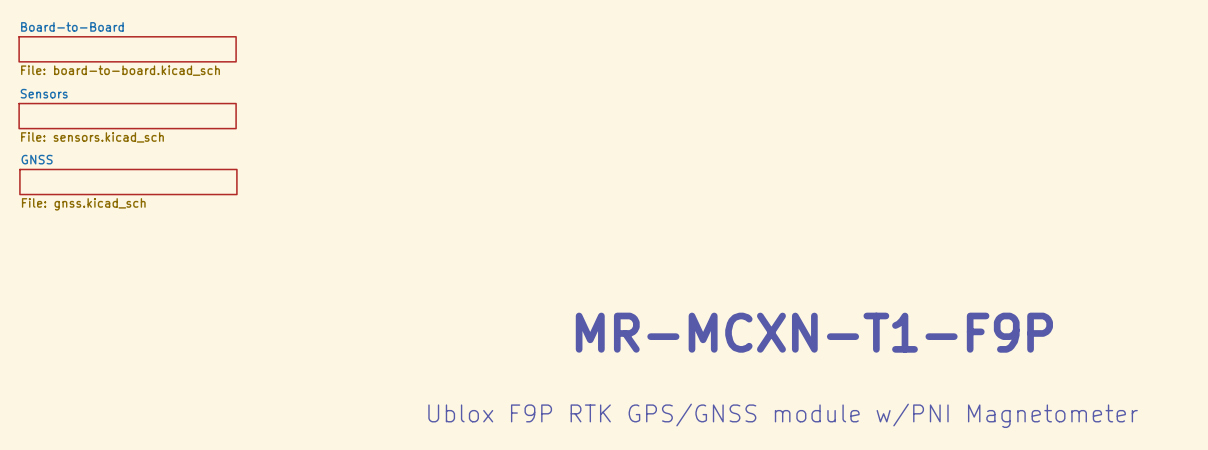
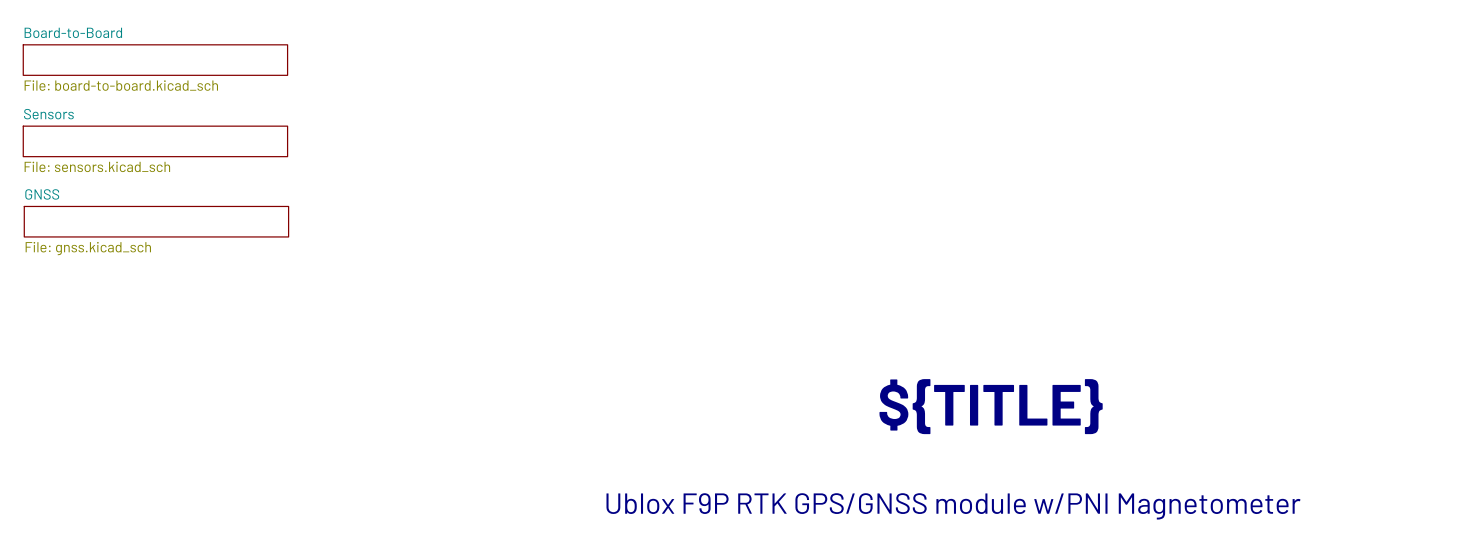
text: MR-MCXN-T1-F9P (814, 332) -> ${TITLE} (991, 406)

